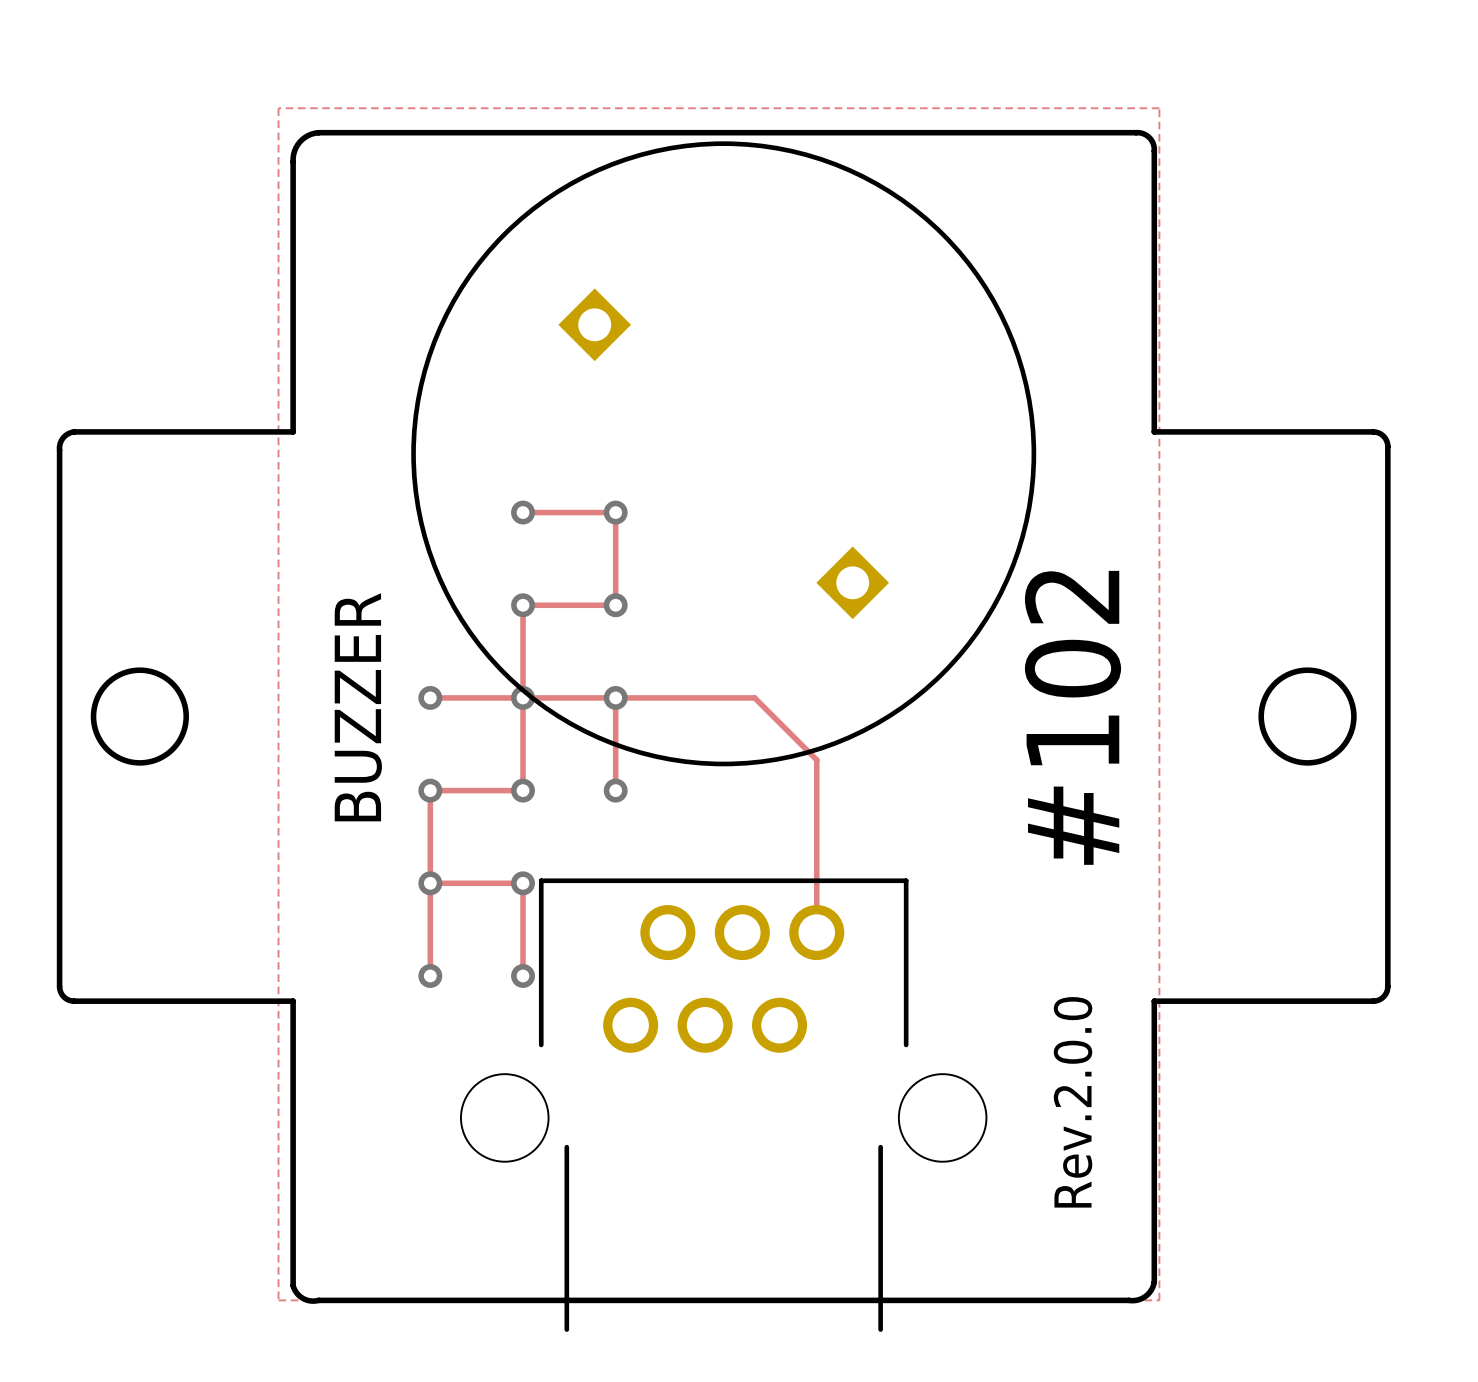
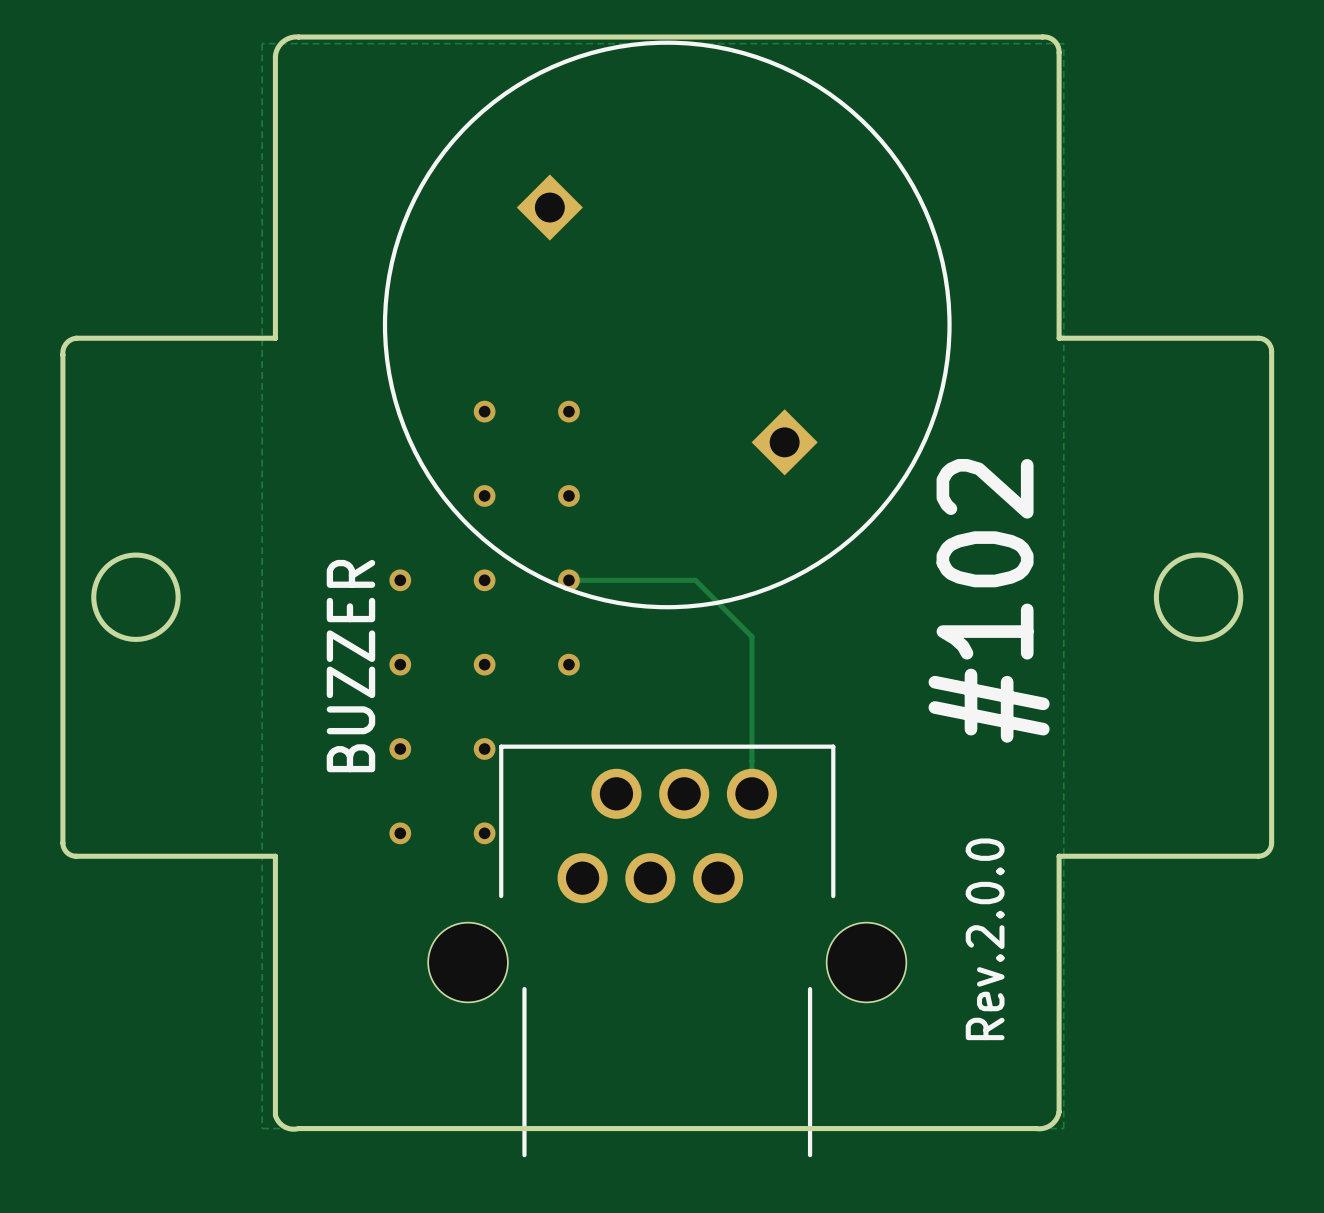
board edge: (1154, 150) (1153, 144) (1149, 137) (1138, 132) (318, 132) (308, 135) (299, 142) (294, 151) (293, 161) -> (1059, 82) (1058, 47) (1052, 39) (1044, 36) (295, 36) (283, 41) (276, 50) (275, 92)
part position: (723, 453) -> (667, 324)
track: (523, 512) (615, 512) (615, 605) (523, 605) (523, 790) (430, 790) (430, 975) -> none
track: (430, 697) (615, 697) (615, 790) -> none
text position: BUZZER (358, 707) -> BUZZER (350, 666)
track: (430, 883) (523, 883) (523, 975) -> none

